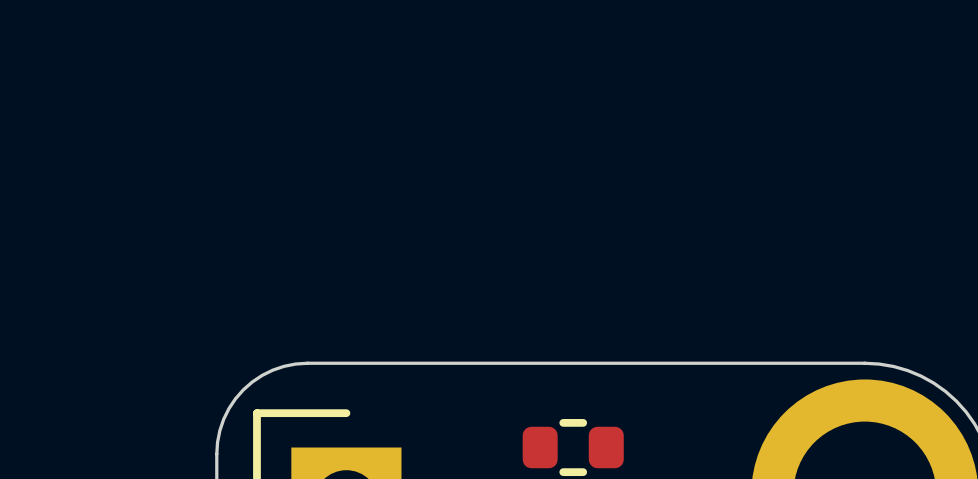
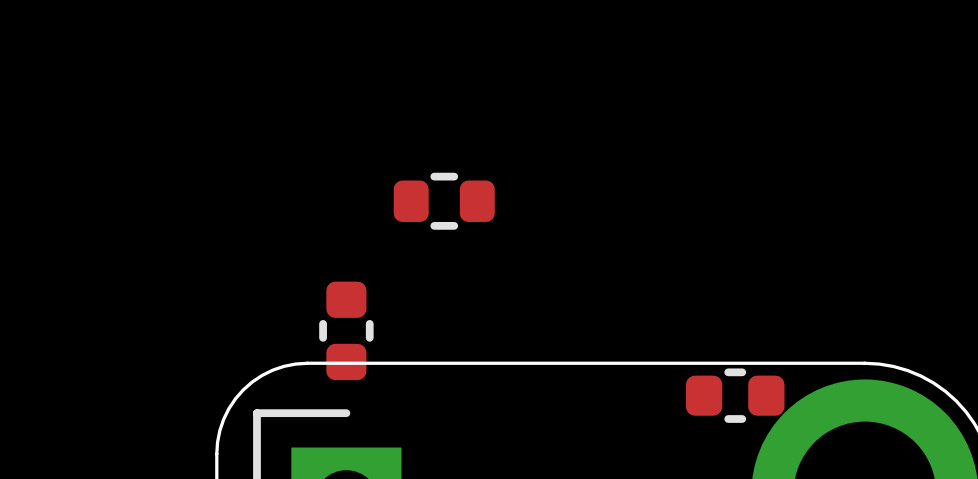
part: none -> (444, 201)
part: none -> (346, 330)
part: none -> (735, 395)
part: (573, 447) -> none

